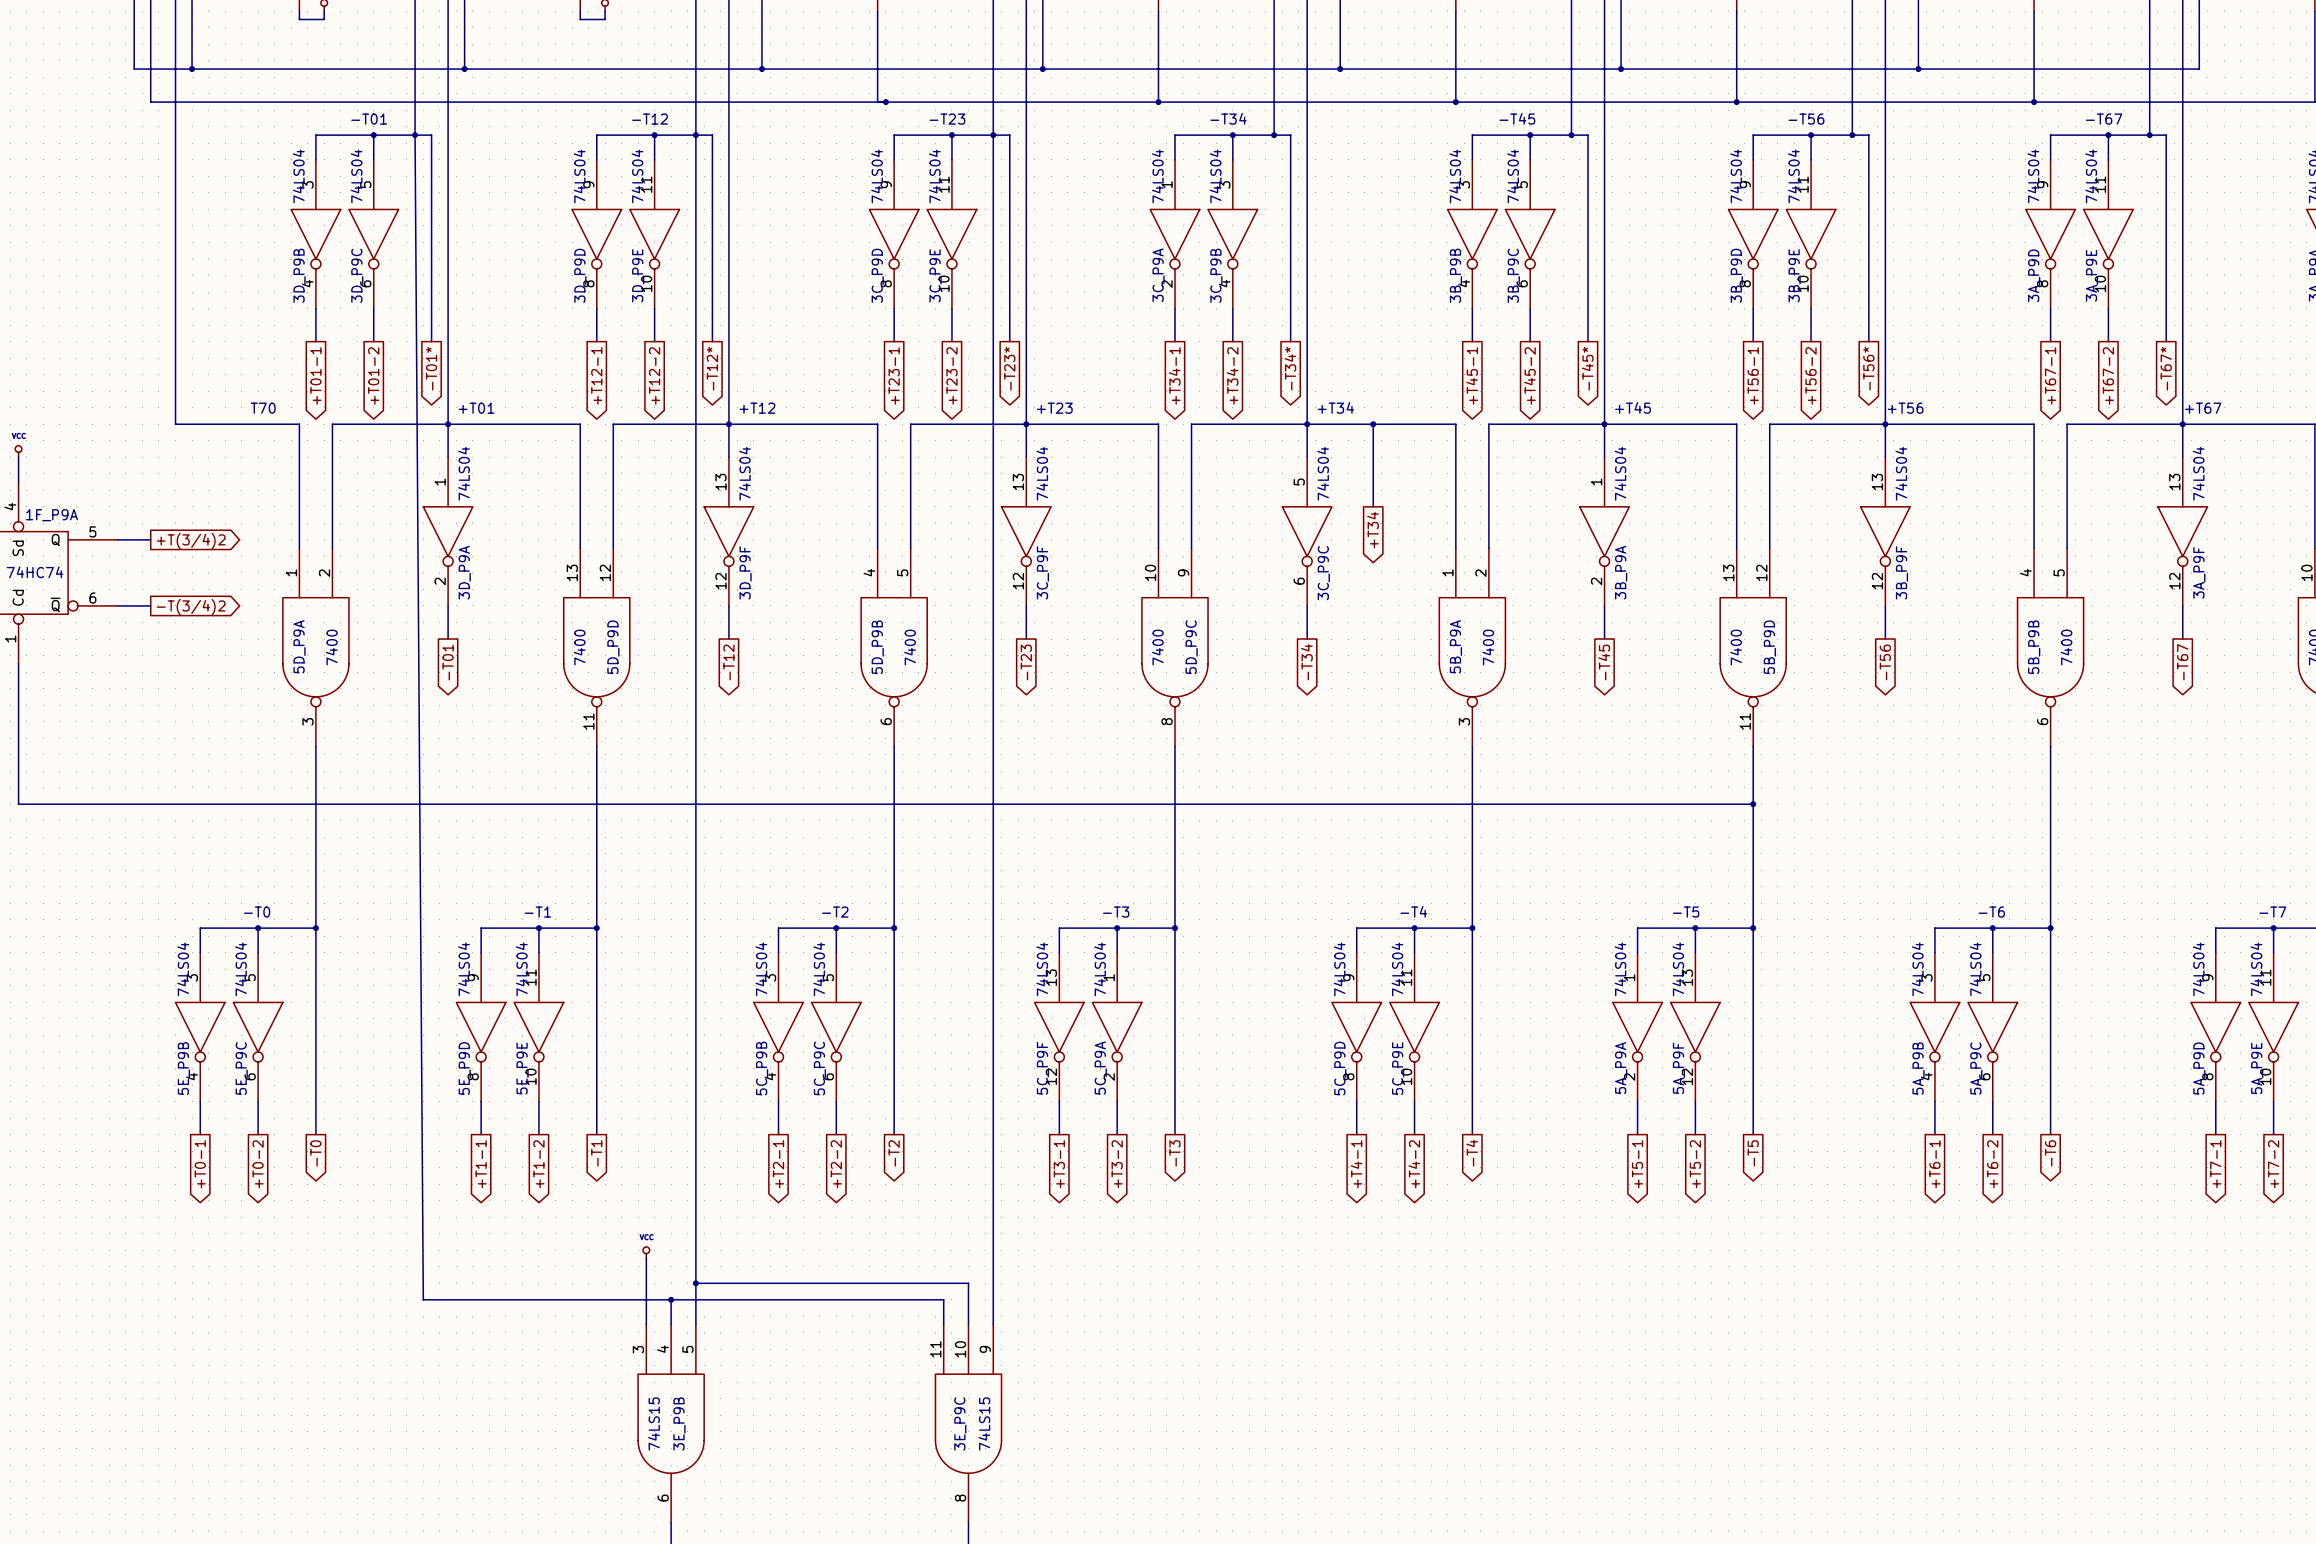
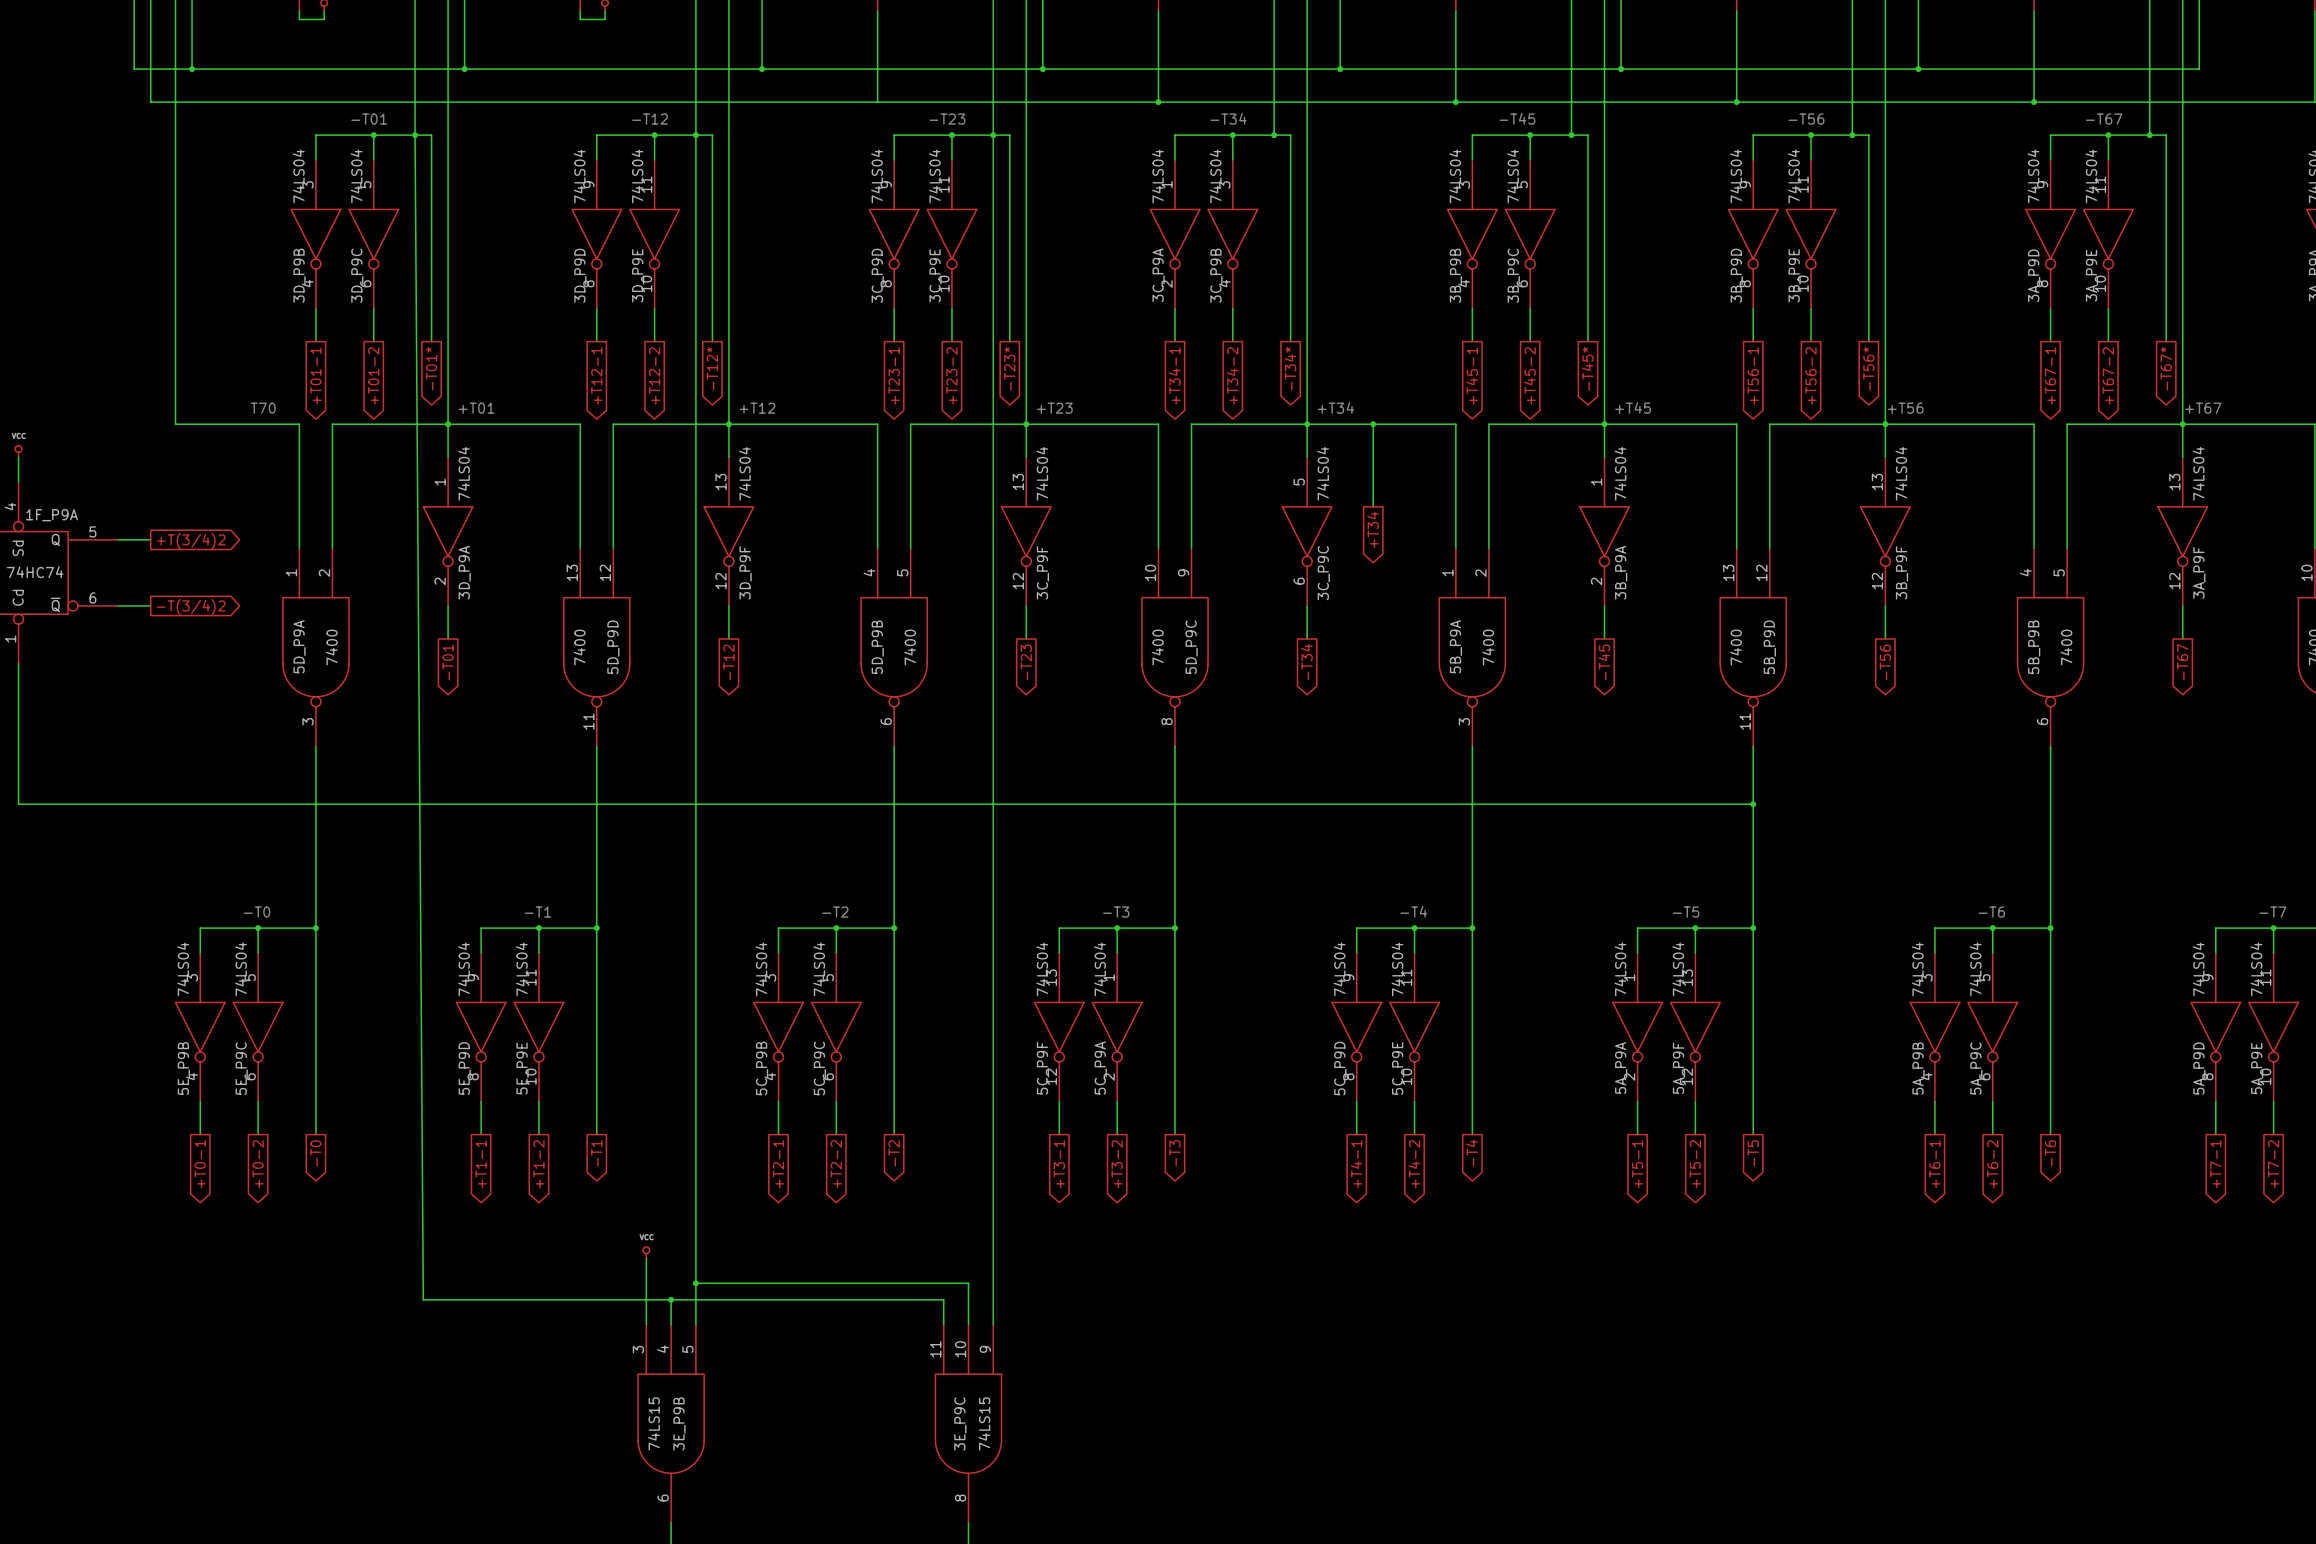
junction: (885, 102) -> none

